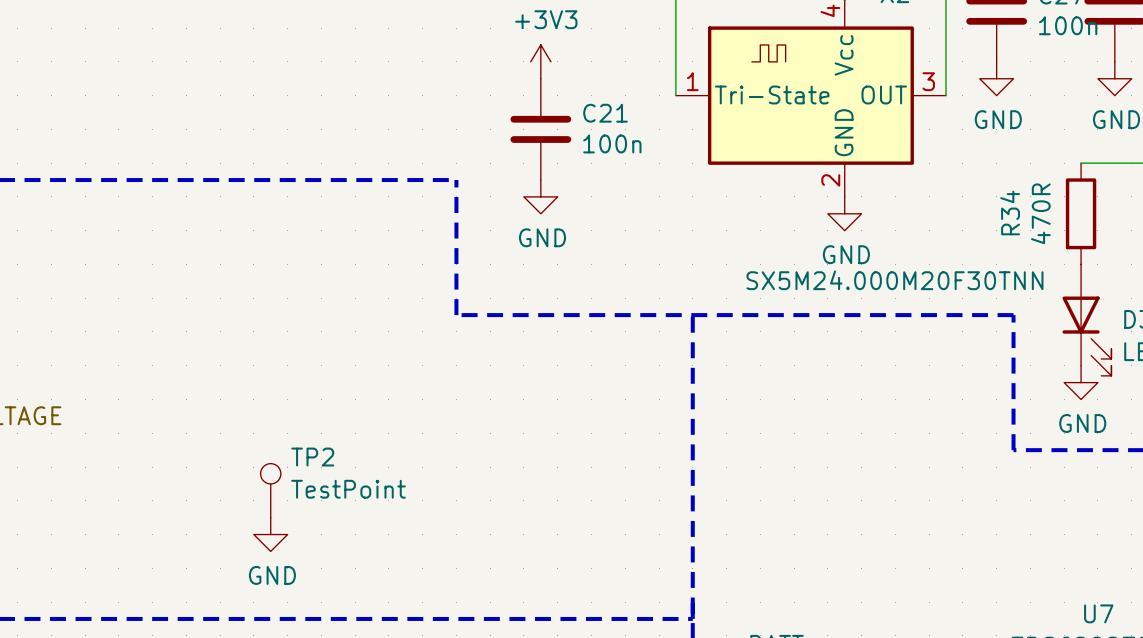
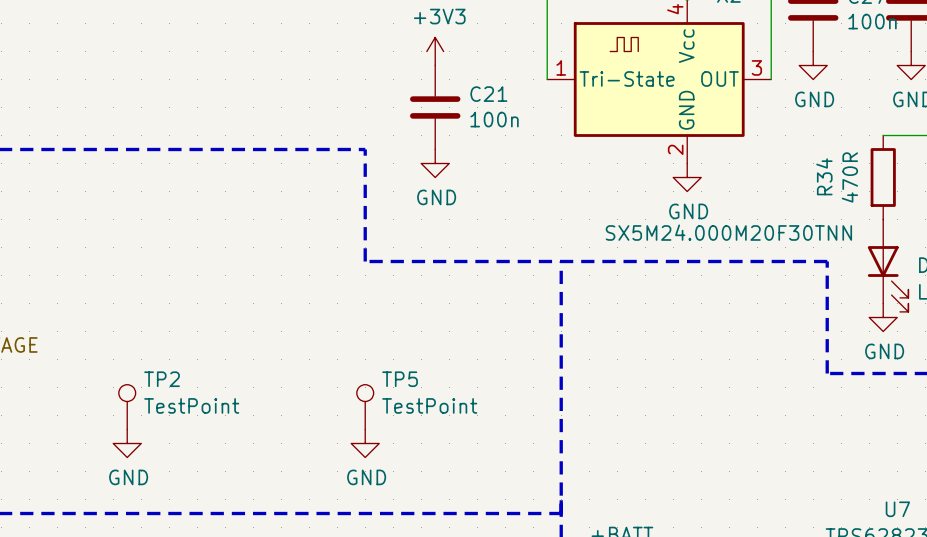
TP2 position: (270, 490) -> (127, 407)
TP5: none -> TestPoint (365, 407)
power symbol: none -> GND (127, 443)
power symbol: GND (270, 534) -> none
power symbol: none -> GND (365, 443)

